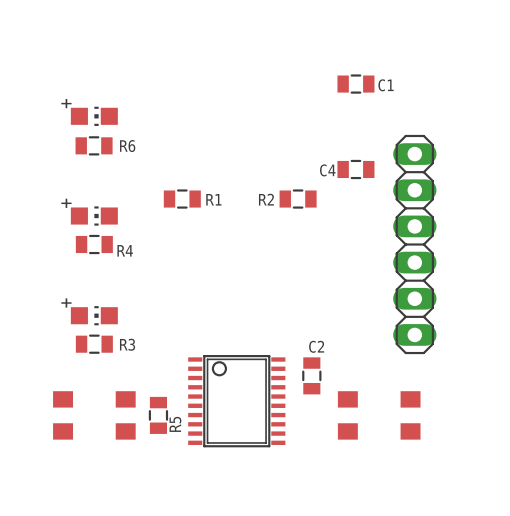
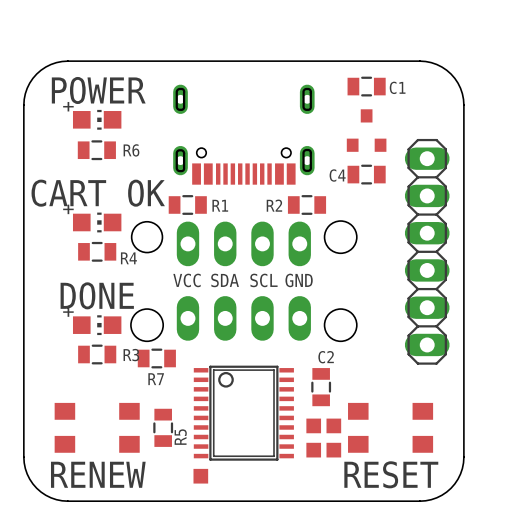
board edge: none -> (67, 61) (419, 61) (436, 64) (451, 74) (460, 88) (463, 105) (463, 457) (460, 474) (451, 488) (436, 497) (419, 501) (67, 501) (51, 497) (36, 488) (27, 474) (23, 457) (24, 99) (29, 83) (41, 70) (56, 62) (67, 61)
text: none -> POWER (98, 90)
part: none -> (366, 130)
part: none -> (243, 134)
text: none -> CART OK (98, 193)
text: none -> VCC (187, 280)
text: none -> SDA (225, 280)
part: none -> (243, 281)
text: none -> SCL (263, 280)
text: none -> GND (299, 280)
text: none -> DONE (97, 295)
R7: none -> (156, 358)
part: none -> (313, 425)
part: none -> (333, 425)
part: none -> (313, 450)
part: none -> (333, 450)
text: none -> RENEW (98, 474)
text: none -> RESET (391, 474)
part: none -> (200, 476)

